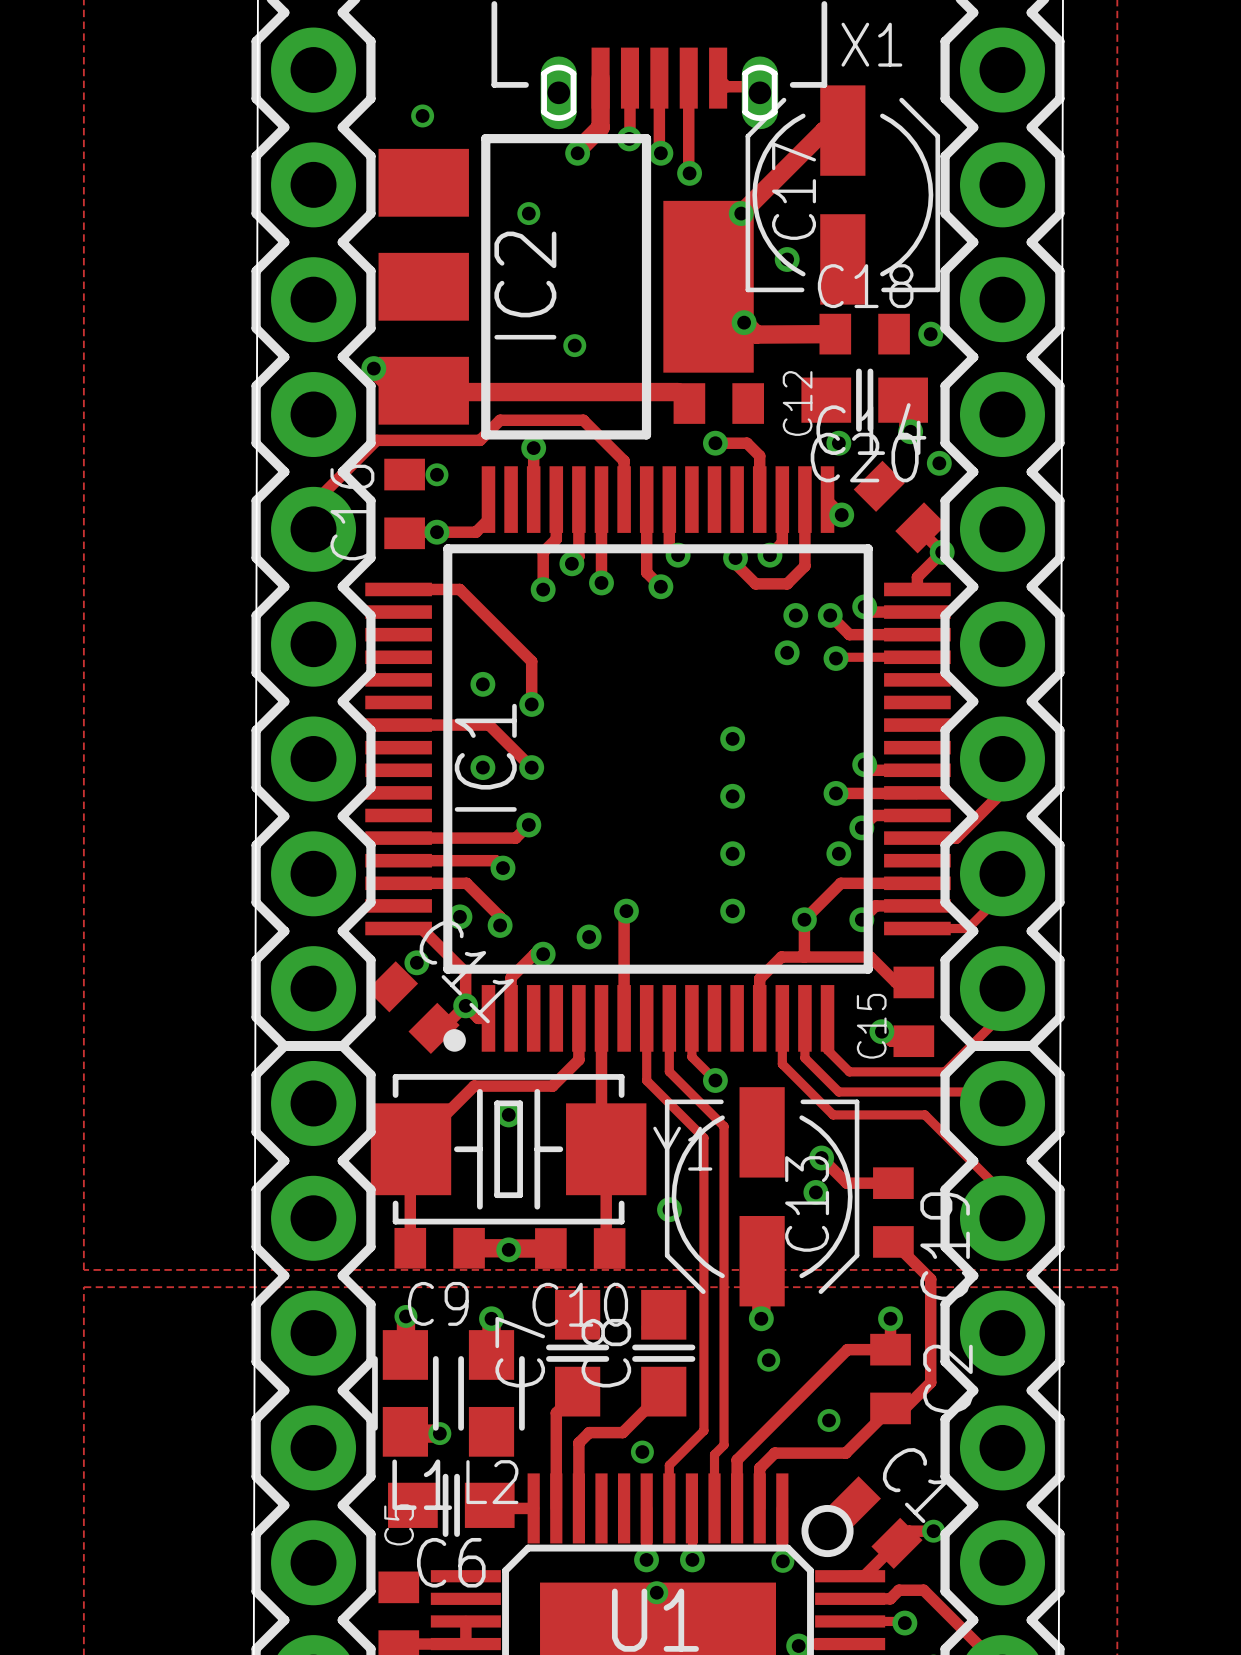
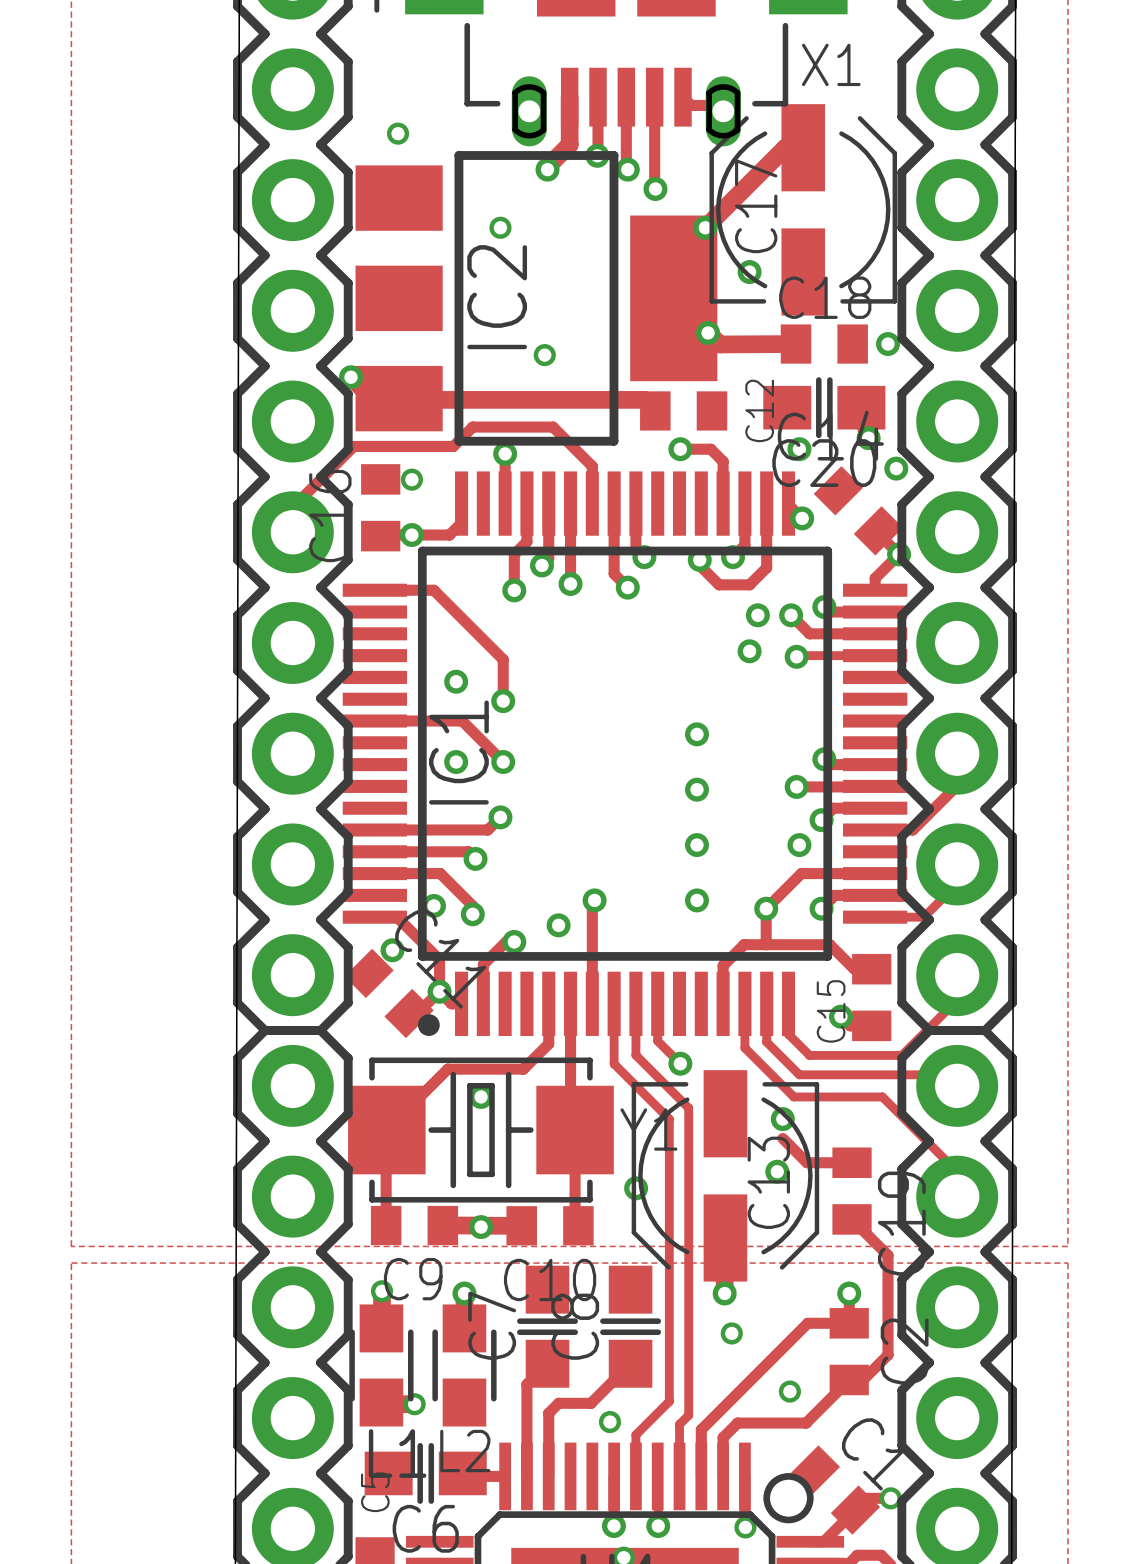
via position: (821, 1158) -> (782, 1119)

